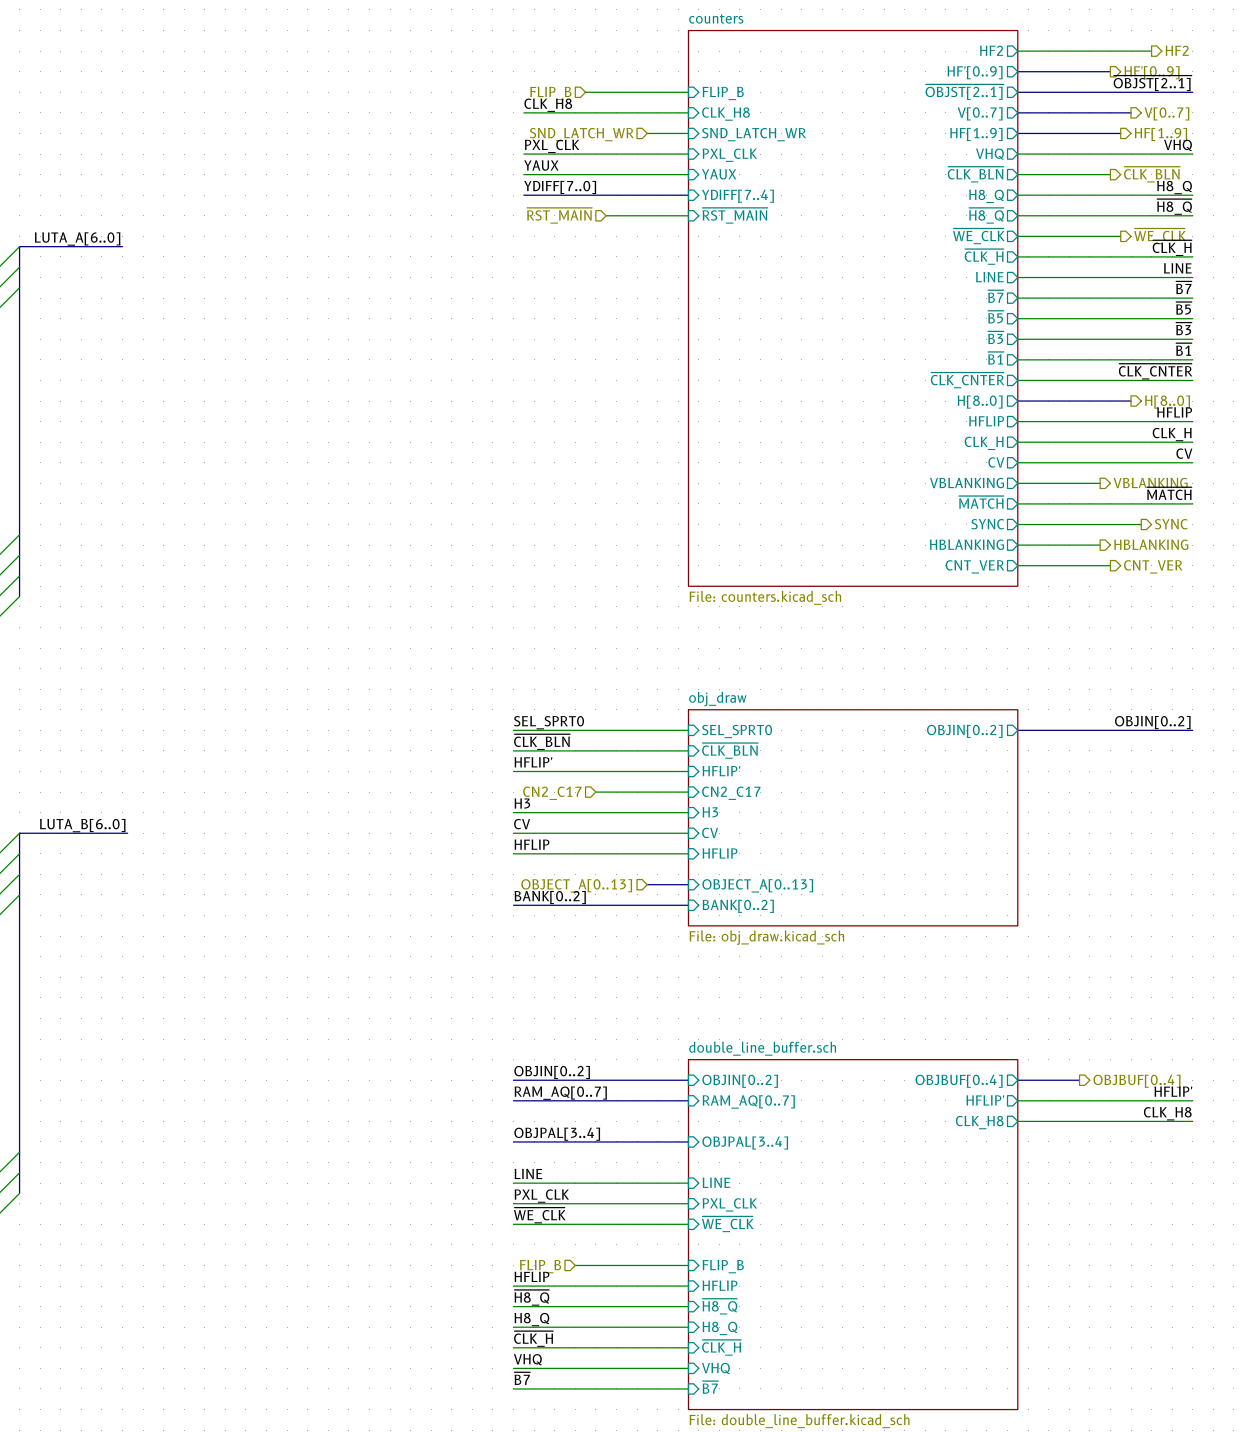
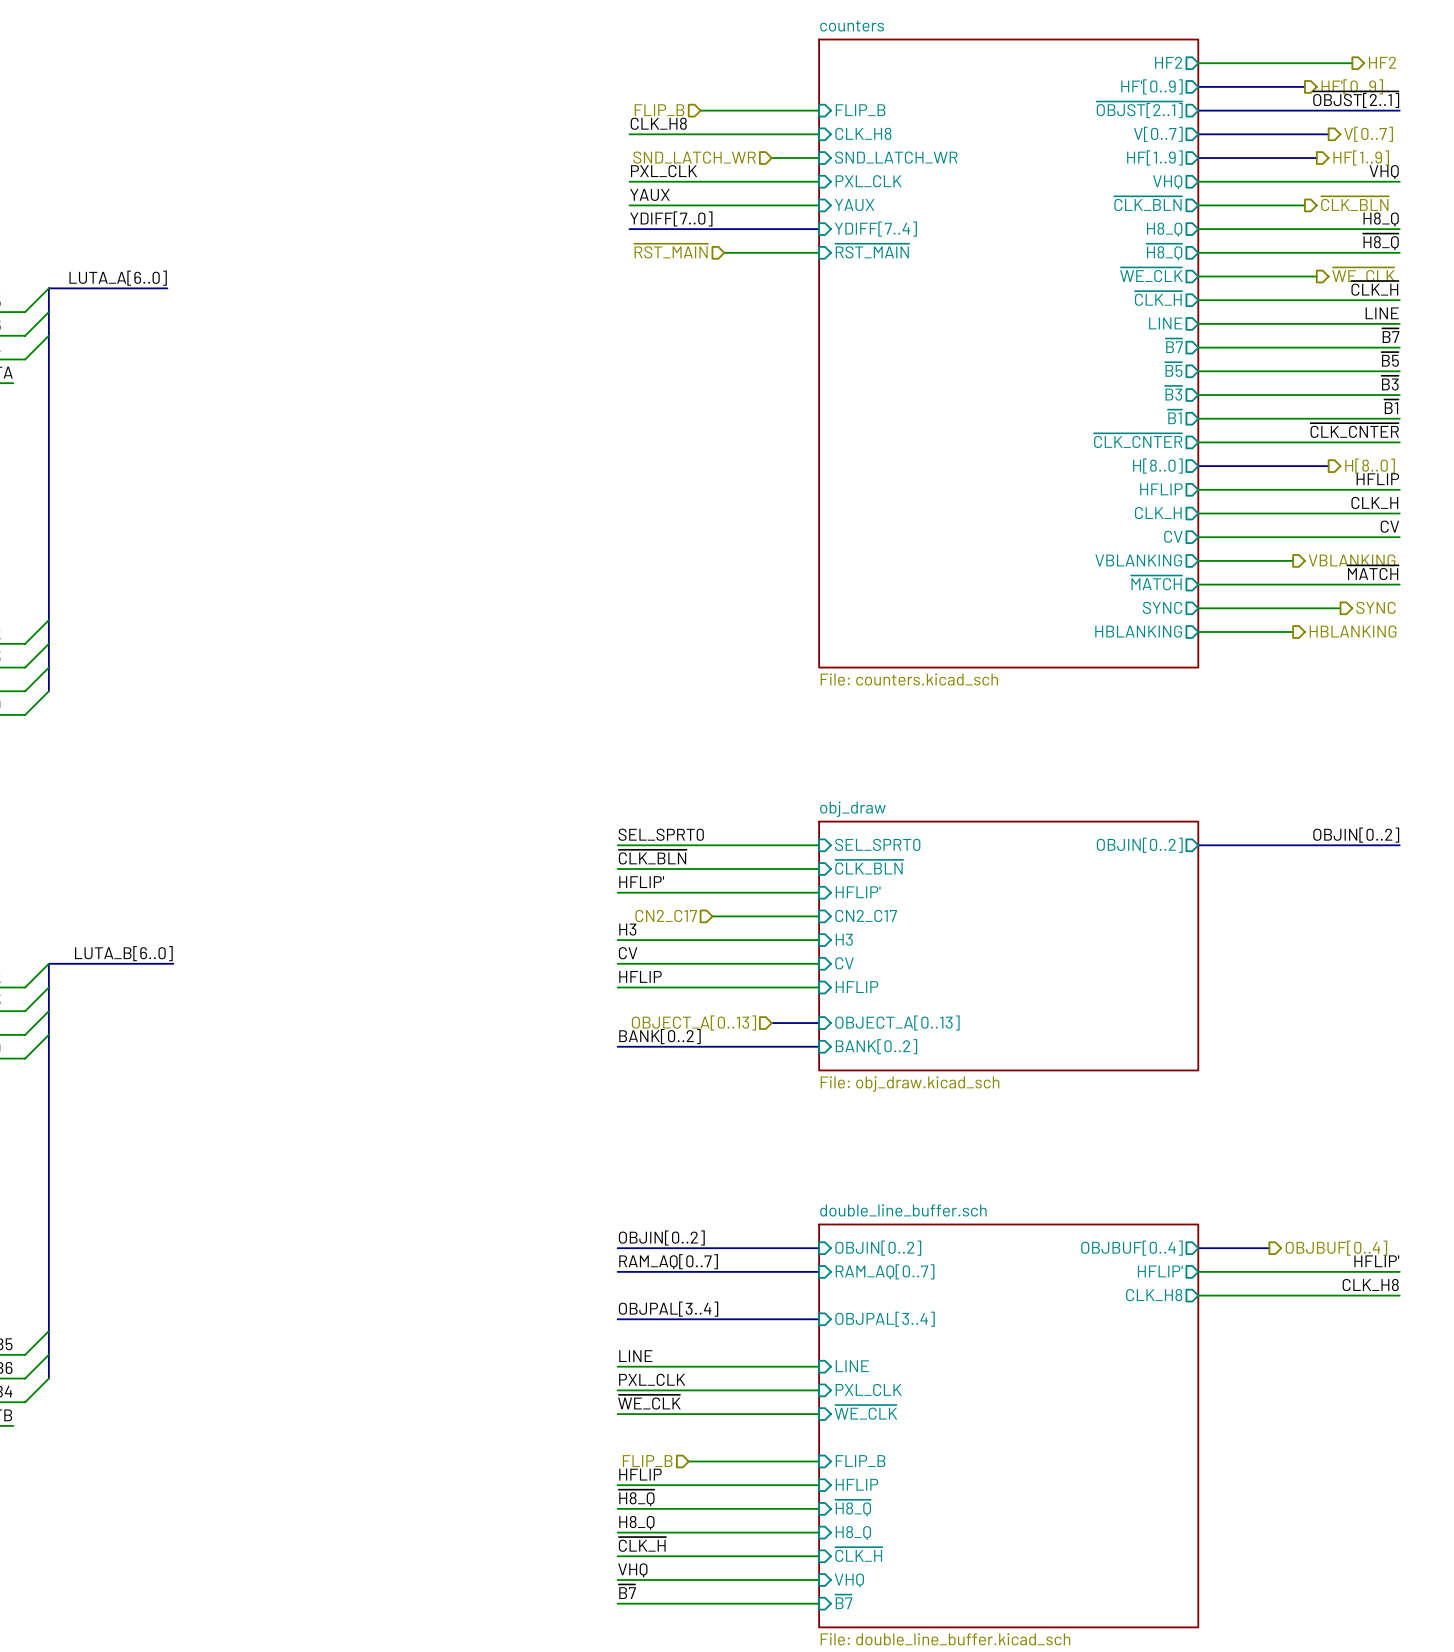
sheet counters shape: [688, 30, 1018, 587] -> [819, 39, 1199, 668]
wire: (1017, 565) (1110, 565) -> none
sheet pin: CNT_VER (975, 566) -> none
hierarchical label: CNT_VER (1153, 566) -> none

